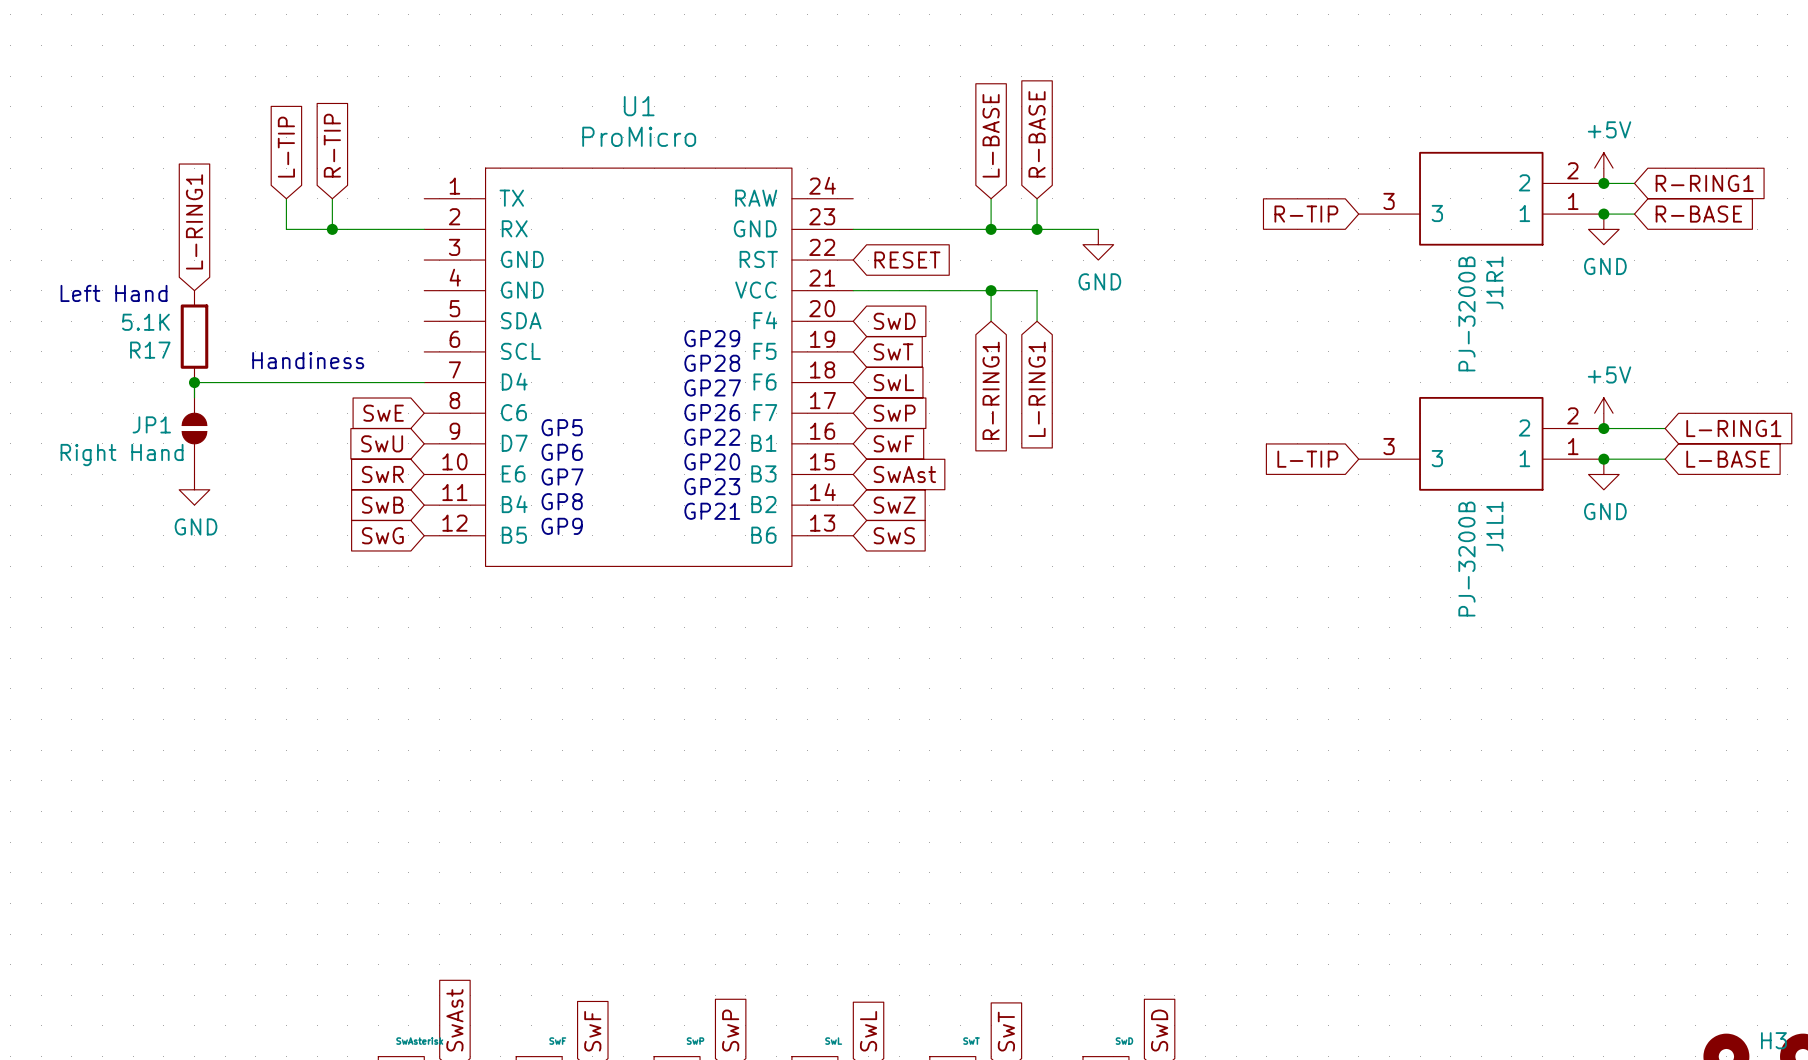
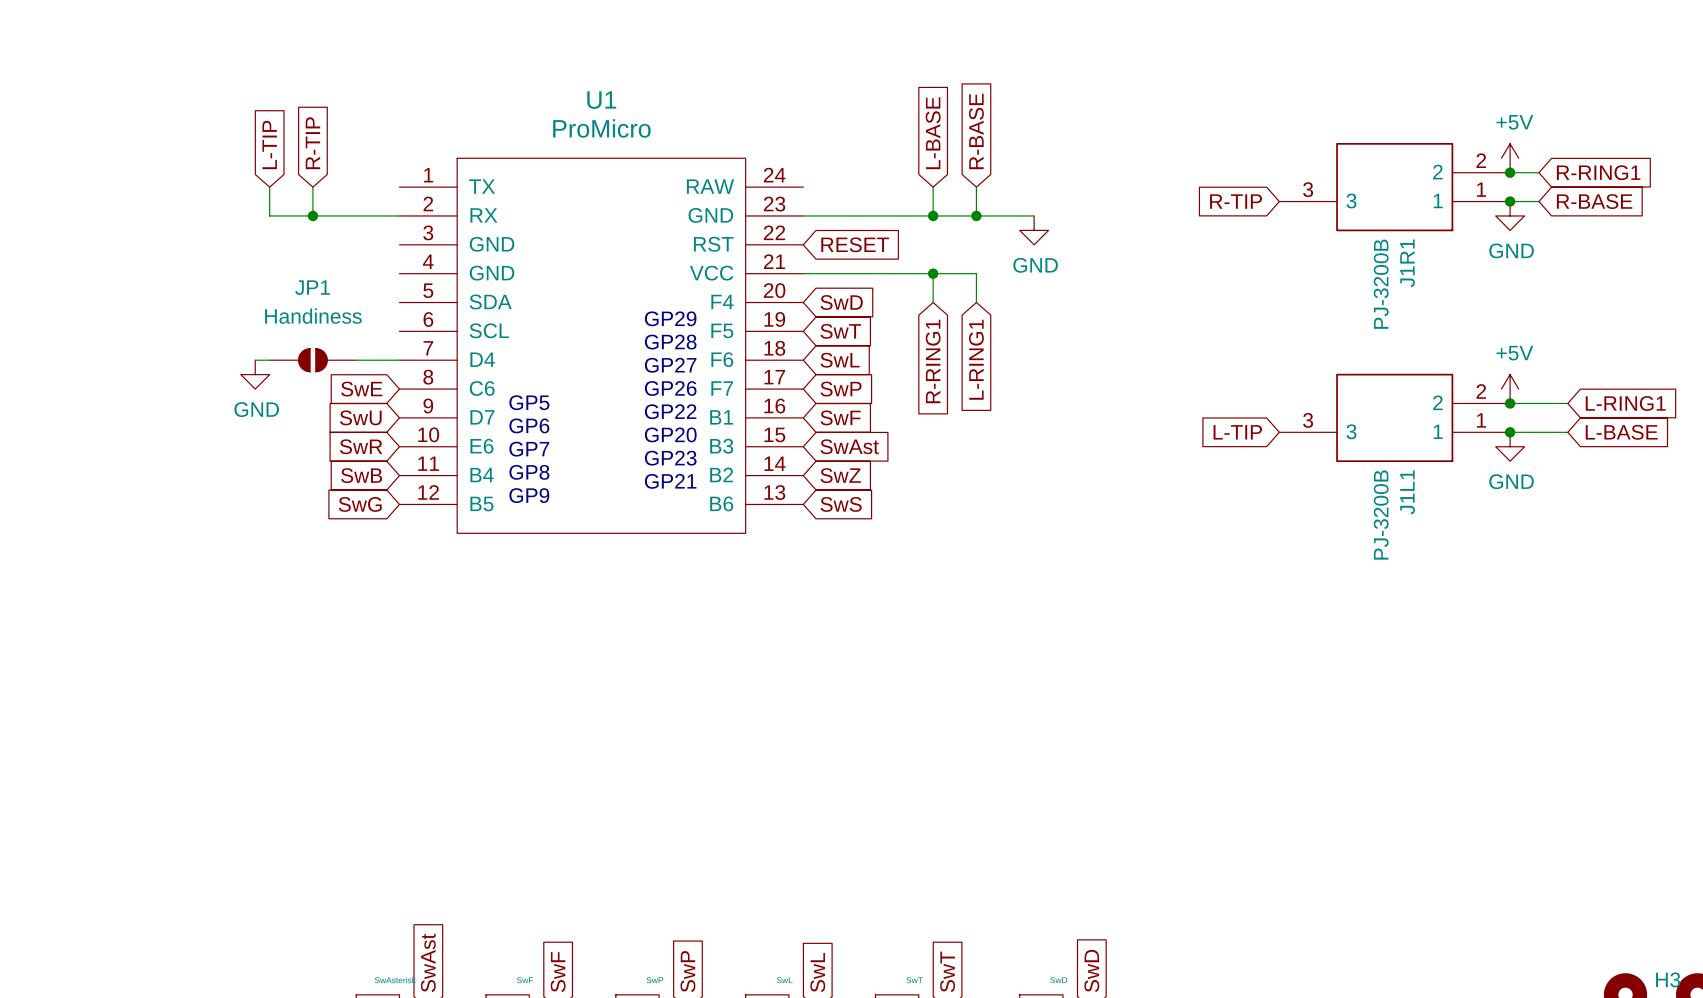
global label: L-RING1 (194, 221) -> none
text: Left Hand (114, 293) -> none
R17: 5.1K (194, 336) -> none
text: Handiness (308, 360) -> none
junction: (194, 382) -> none
wire: (271, 382) (194, 382) (194, 397) -> none
JP1 name position: JP1 (151, 424) -> JP1 (312, 287)
JP1 rotation: 0° (194, 428) -> 90° clockwise (312, 360)
JP1 position: (194, 428) -> (312, 360)
JP1 value: Right Hand (122, 455) -> Handiness (313, 316)
power symbol position: GND (194, 489) -> GND (255, 374)

